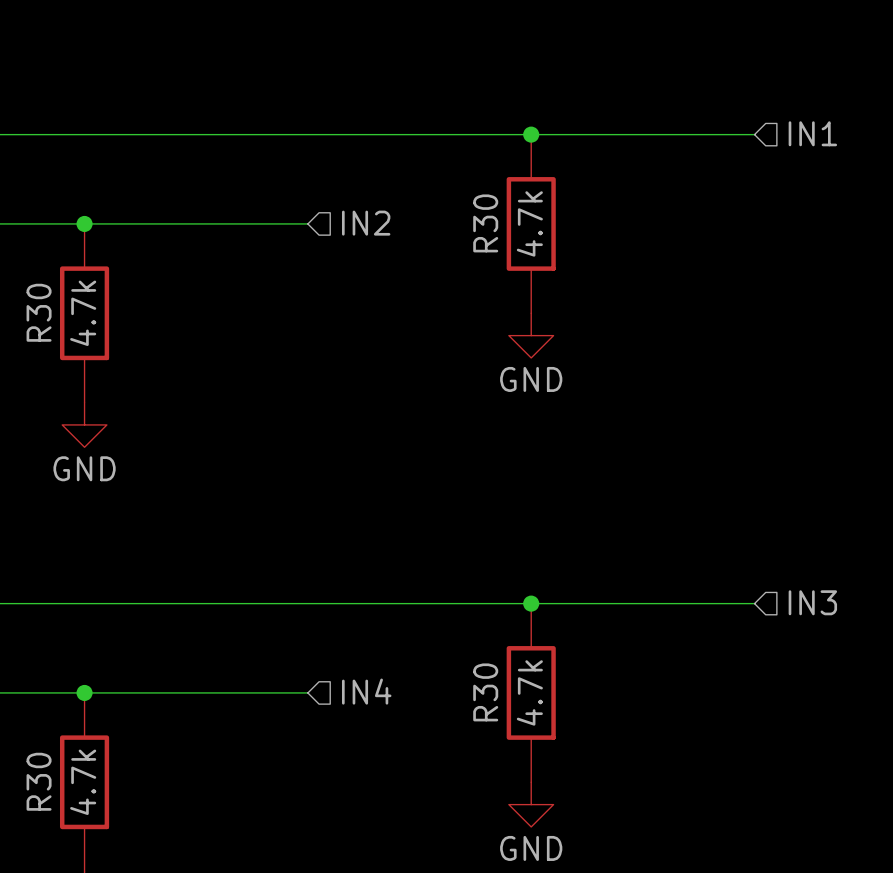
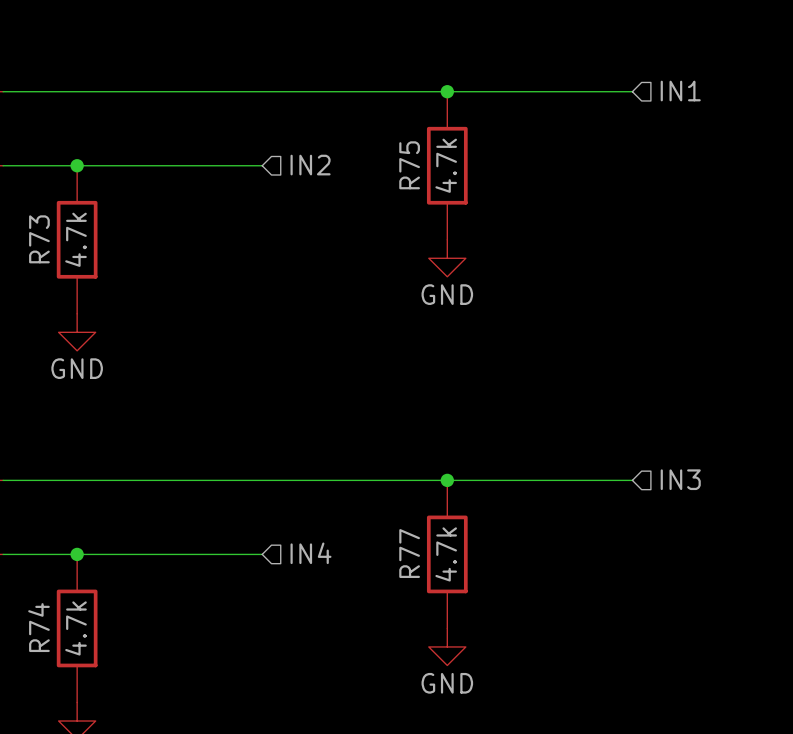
R30 name: R30 (485, 223) -> R75 (409, 165)
R30 name: R30 (39, 312) -> R73 (39, 239)
R30 name: R30 (485, 692) -> R77 (409, 553)
R30 name: R30 (39, 781) -> R74 (38, 627)

